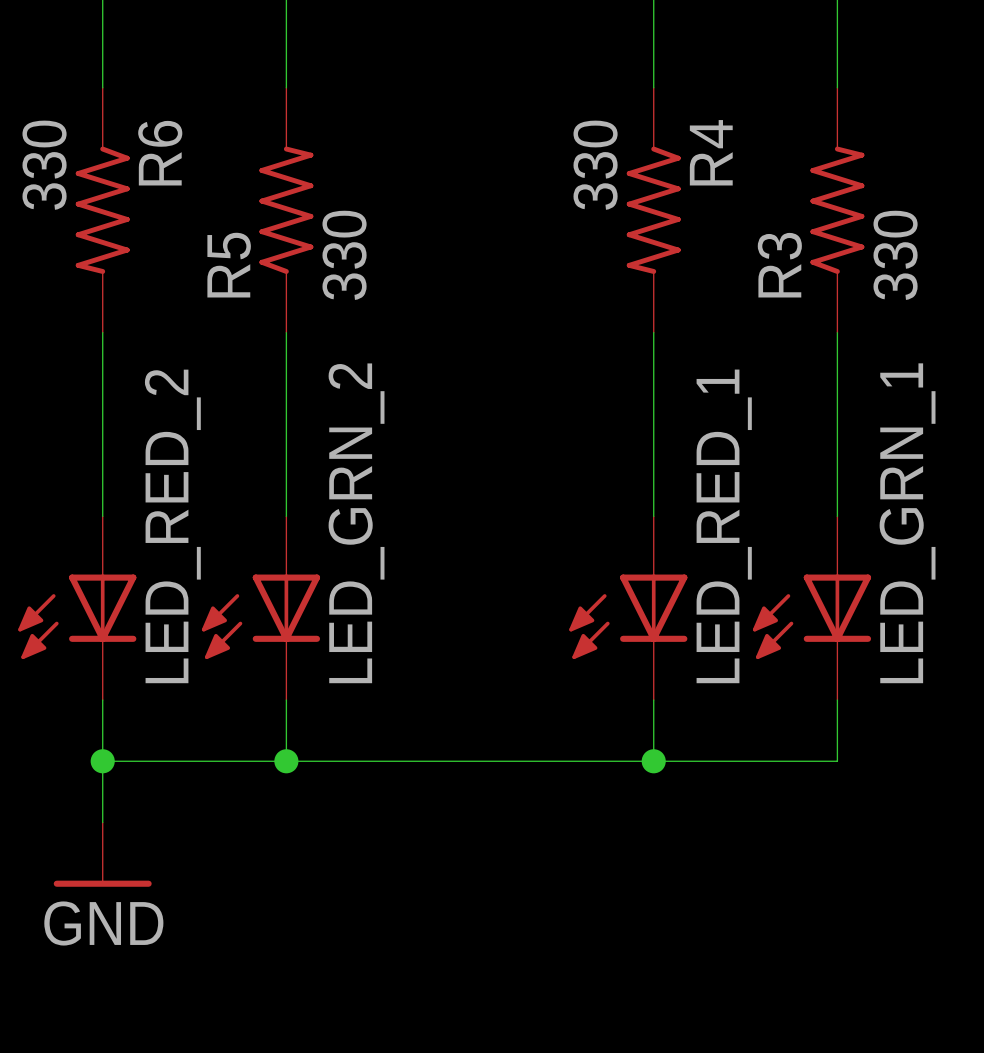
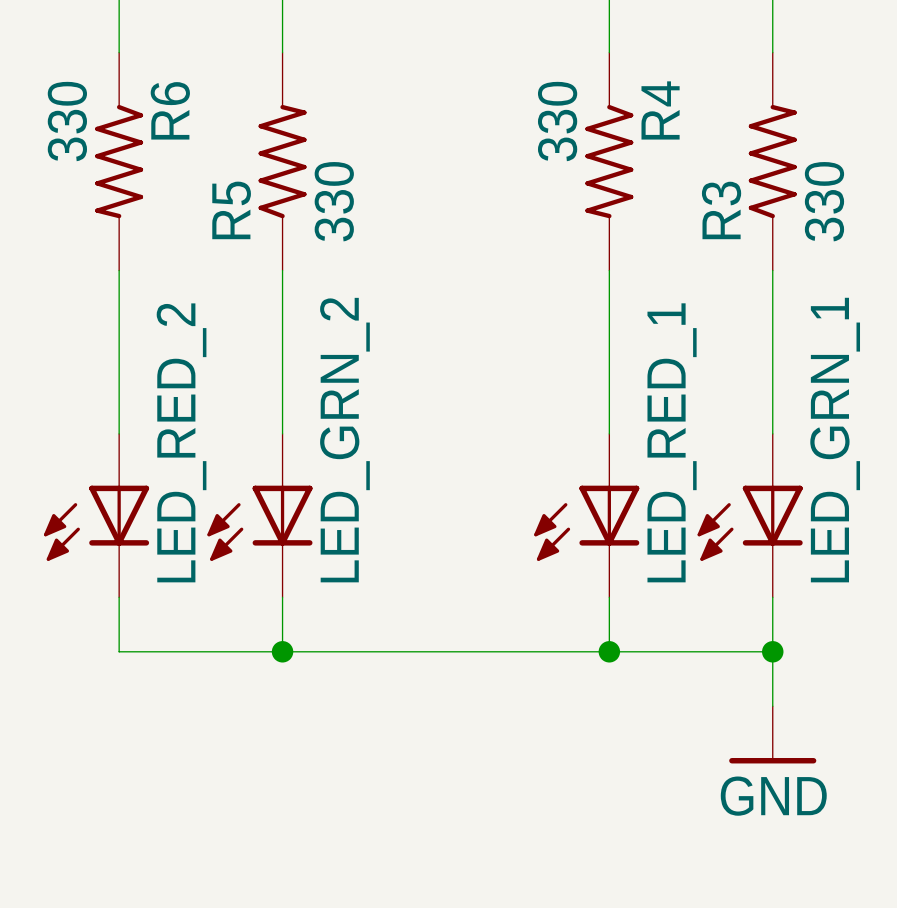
wire: (102, 761) (102, 822) -> none
junction: (102, 761) -> none
wire: none -> (772, 651) (772, 706)
junction: none -> (772, 651)
power symbol: GND (102, 854) -> none
power symbol: none -> GND (772, 734)

